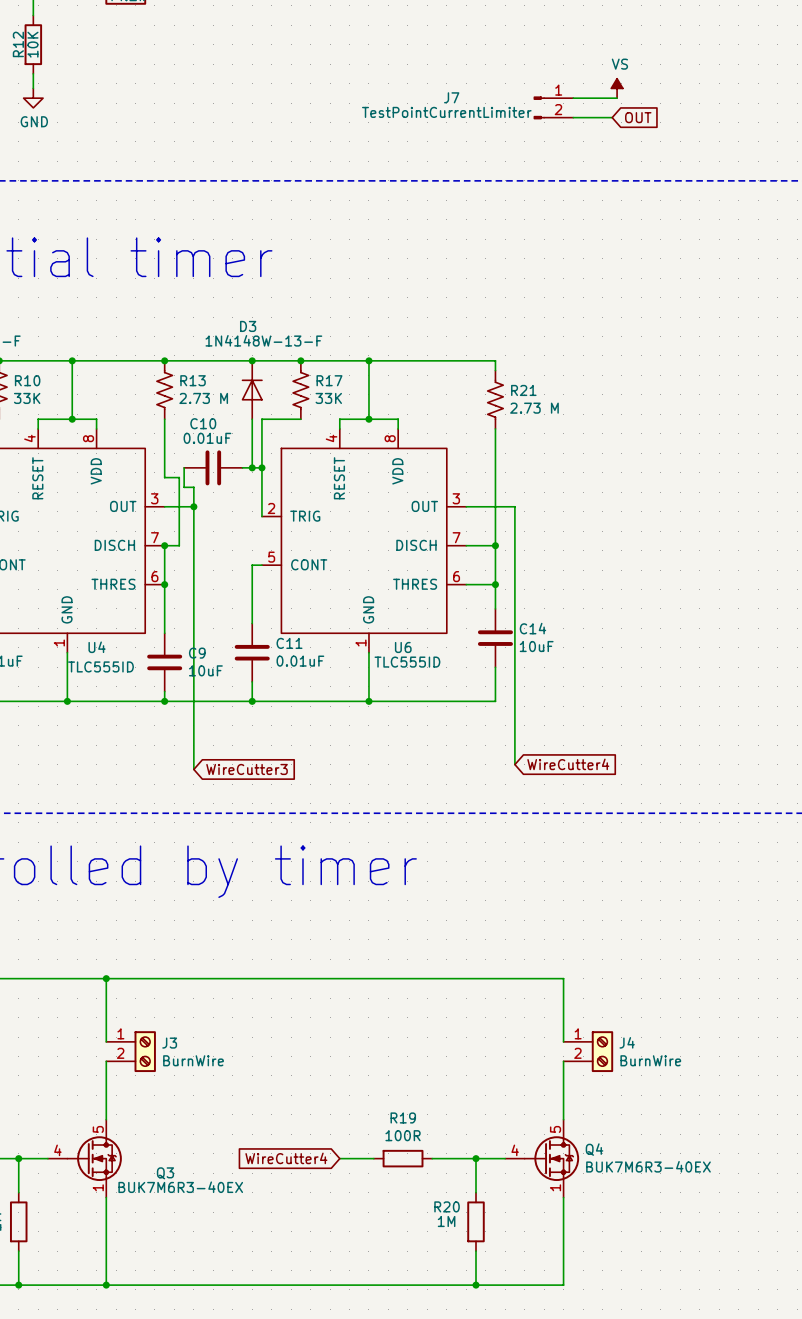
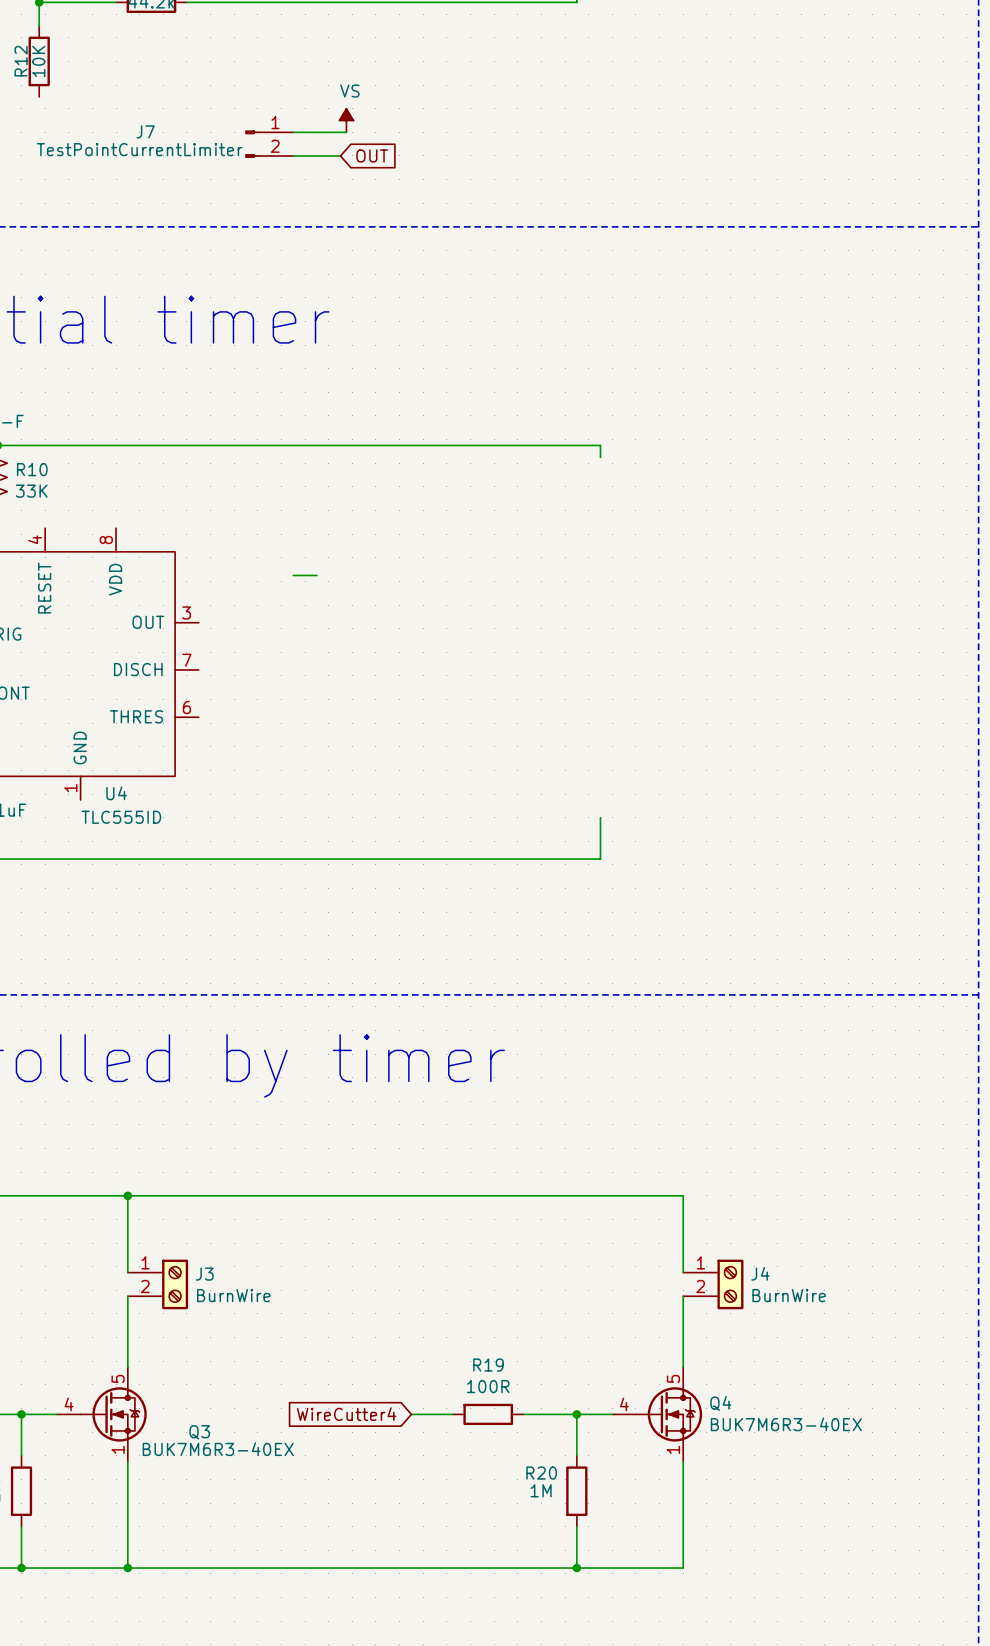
wire: (33, 73) (33, 88) -> none
power symbol: VS (617, 88) -> none
power symbol: none -> VS (346, 120)
power symbol: GND (33, 98) -> none
wire: (573, 98) (617, 98) -> none
wire: none -> (293, 132) (346, 132)
J7 position: (553, 107) -> (269, 144)
wire: (573, 117) (612, 117) -> none
global label: OUT (638, 117) -> none
wire: none -> (293, 155) (340, 155)
global label: none -> OUT (372, 155)
wire: (72, 360) (72, 419) -> none
junction: (72, 360) -> none
junction: (164, 360) -> none
junction: (252, 360) -> none
junction: (300, 360) -> none
wire: (368, 360) (368, 419) -> none
junction: (368, 360) -> none
R13: 2.73 M (164, 390) -> none
D3: 1N4148W-13-F (252, 390) -> none
R17: 33K (300, 390) -> none
R21: 2.73 M (495, 399) -> none
junction: (72, 419) -> none
wire: (164, 419) (164, 477) (179, 477) (179, 545) (164, 545) (164, 633) -> none
wire: (252, 419) (252, 467) -> none
wire: (300, 419) (261, 419) (261, 516) -> none
junction: (368, 419) -> none
wire: (38, 428) (38, 419) (96, 419) (96, 428) -> none
wire: (339, 428) (339, 419) (398, 419) (398, 428) -> none
wire: (495, 428) (495, 608) -> none
wire: (184, 467) (184, 487) (193, 487) (193, 769) -> none
C10: 0.01uF (213, 467) -> none
junction: (252, 467) -> none
junction: (261, 467) -> none
wire: (164, 506) (193, 506) -> none
junction: (193, 506) -> none
wire: (466, 506) (514, 506) (514, 764) -> none
U6: TLC555ID (364, 540) -> none
junction: (164, 545) -> none
wire: (466, 545) (495, 545) -> none
junction: (495, 545) -> none
wire: (261, 565) (252, 565) (252, 623) -> none
junction: (164, 584) -> none
wire: (466, 584) (495, 584) -> none
junction: (495, 584) -> none
C14: 10uF (495, 638) -> none
wire: (67, 652) (67, 701) -> none
C11: 0.01uF (252, 652) -> none
wire: (368, 652) (368, 701) -> none
C9: 10uF (164, 662) -> none
wire: (252, 681) (252, 701) -> none
wire: (164, 691) (164, 701) -> none
junction: (67, 701) -> none
junction: (164, 701) -> none
junction: (252, 701) -> none
junction: (368, 701) -> none
global label: WireCutter4 (568, 764) -> none
global label: WireCutter3 (247, 769) -> none

